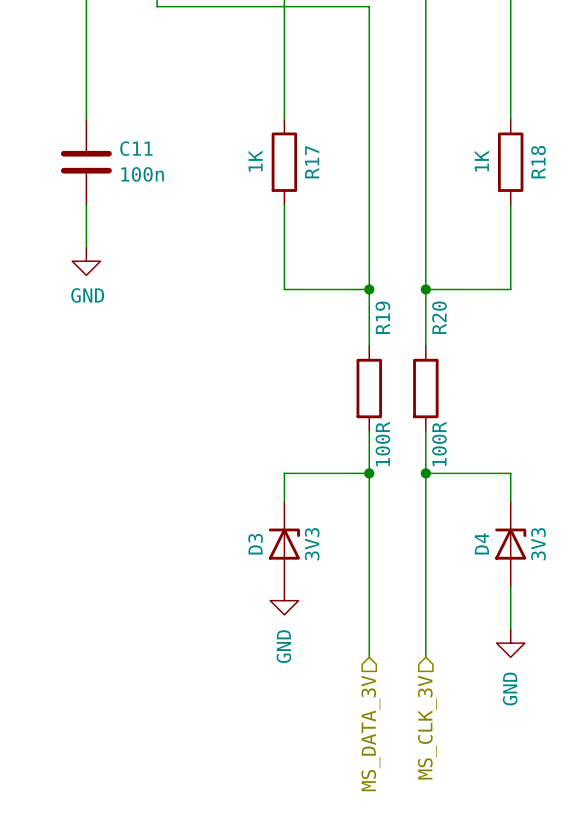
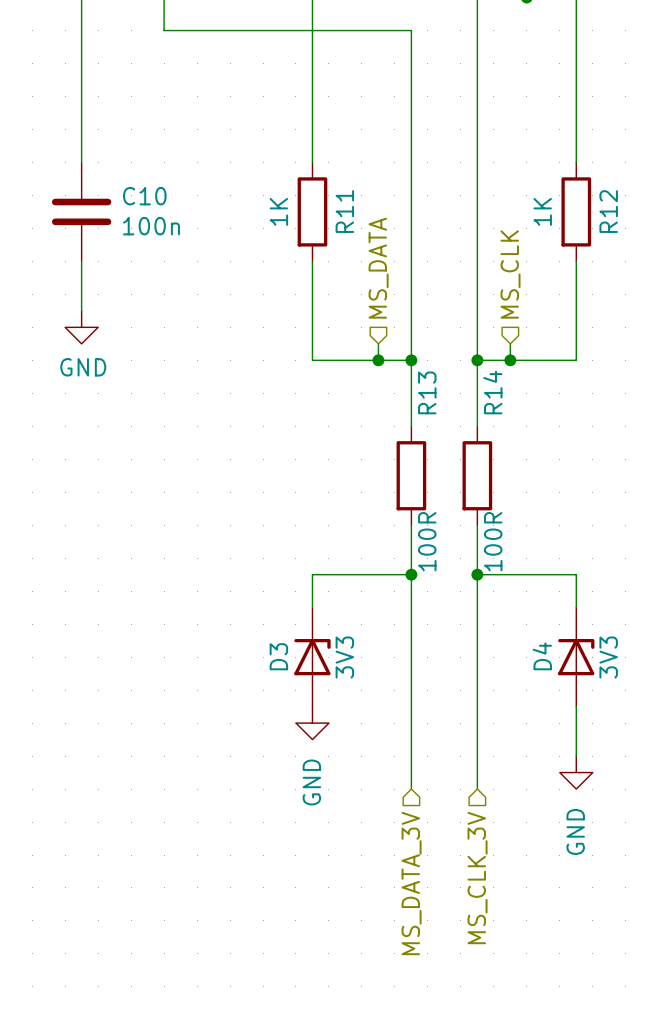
C11 name: C11 (136, 148) -> C10 (144, 196)
R17 name: R17 (312, 162) -> R11 (344, 211)
R18 name: R18 (538, 162) -> R12 (608, 211)
hierarchical label: none -> MS_DATA (378, 268)
hierarchical label: none -> MS_CLK (510, 274)
wire: none -> (378, 343) (378, 360)
wire: none -> (510, 343) (510, 360)
junction: none -> (378, 360)
junction: none -> (510, 360)
R19 name: R19 (382, 317) -> R13 (427, 392)
R20 name: R20 (439, 317) -> R14 (492, 392)

